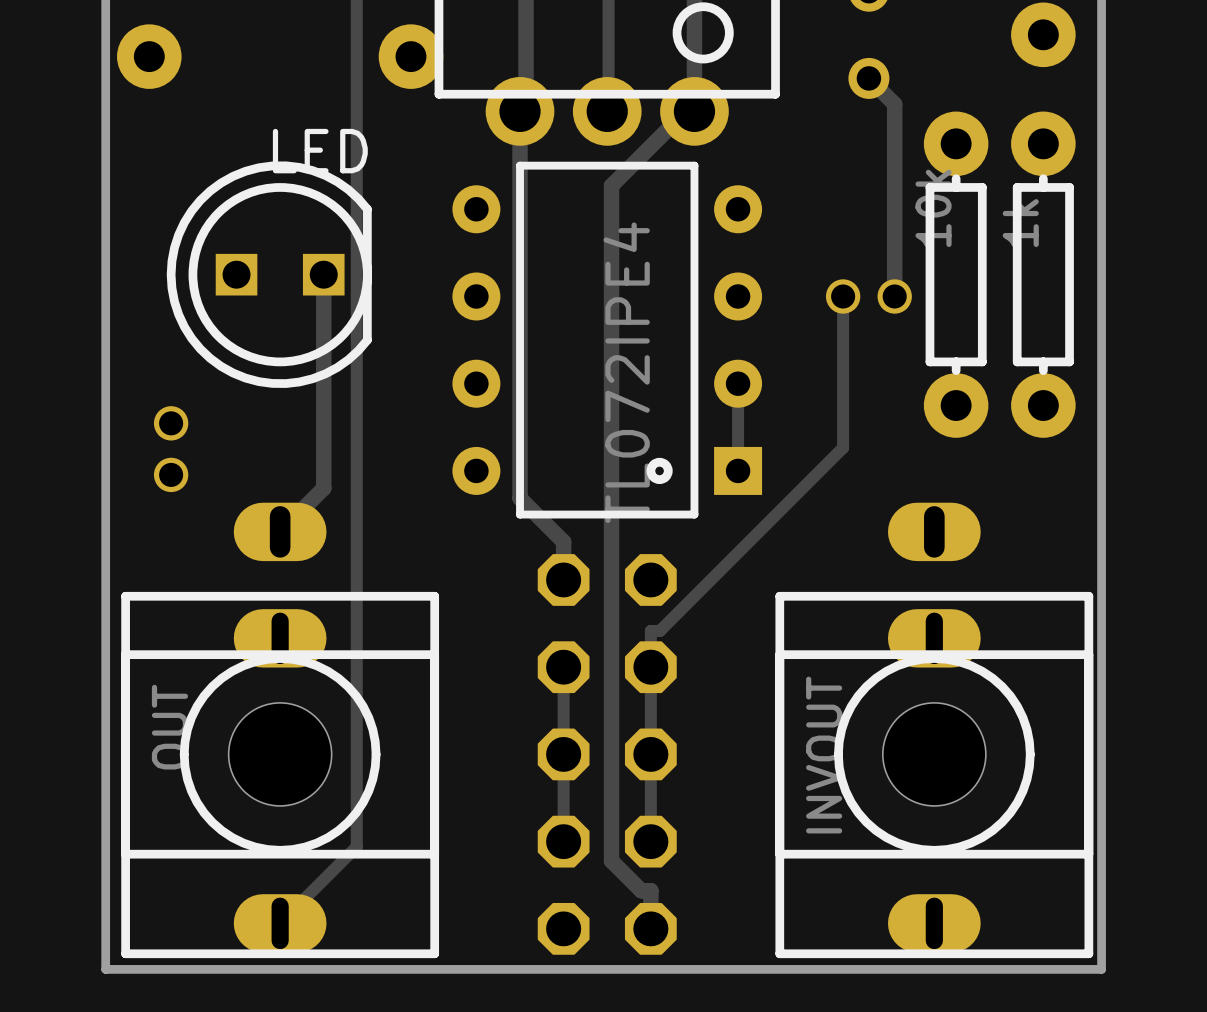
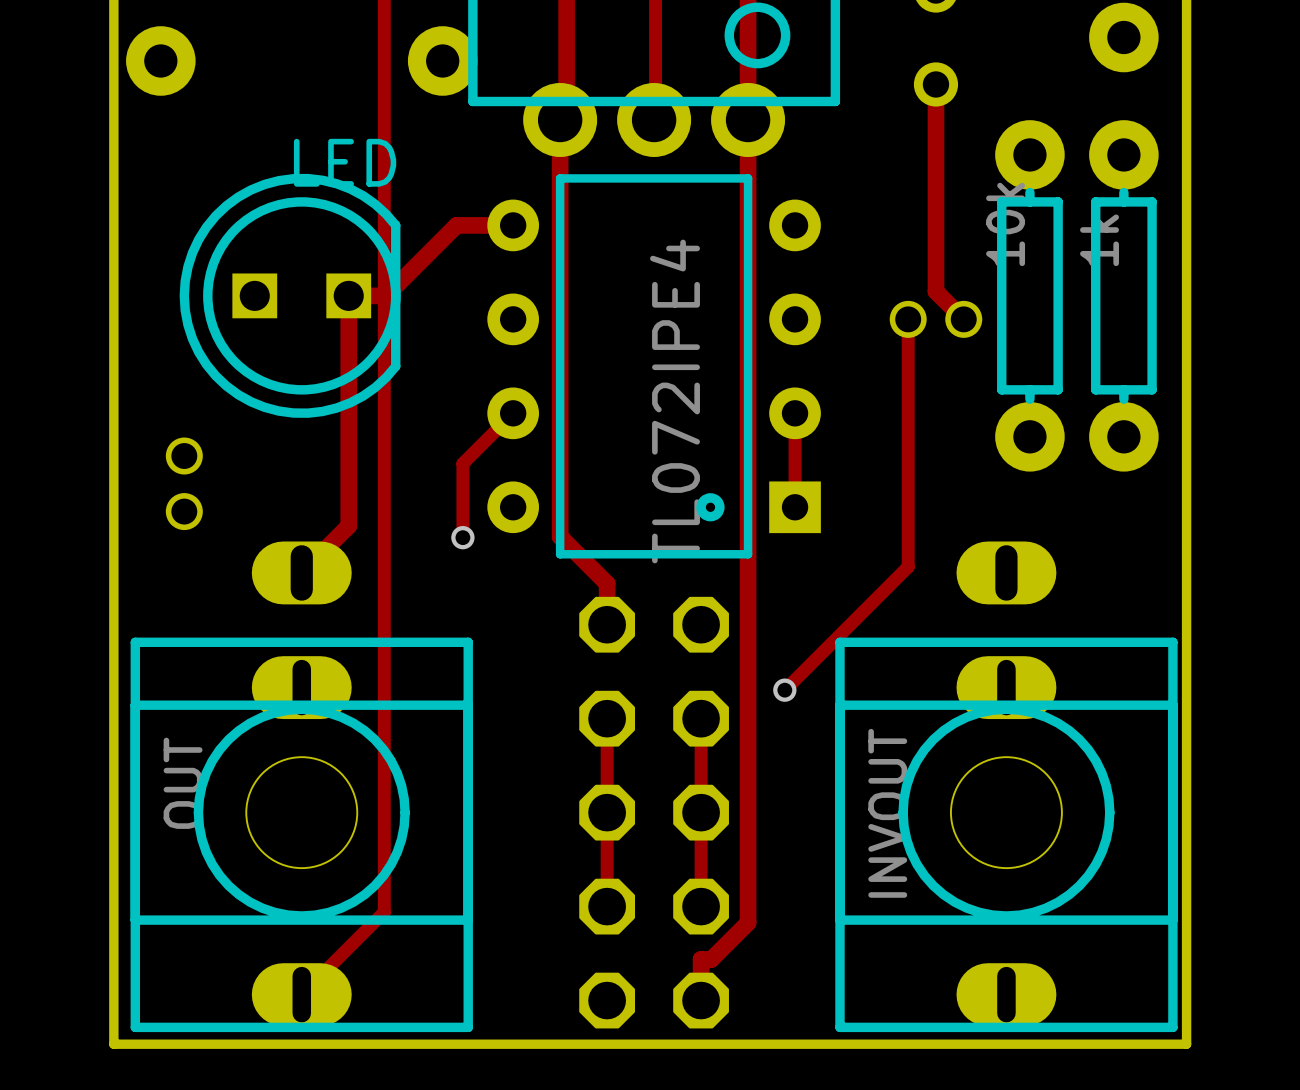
track: (868, 78) (894, 104) (894, 296) -> (935, 84) (935, 291) (963, 319)
track: (694, 111) (685, 111) (611, 185) (611, 860) (641, 890) (650, 890) -> (748, 119) (748, 922) (711, 959) (701, 959)
track: none -> (513, 225) (456, 225) (386, 295) (348, 295)
track: none -> (513, 413) (462, 463) (462, 537)
track: (843, 447) (659, 630) (650, 630) (650, 667) -> (908, 482) (908, 566) (784, 690)
via: none -> (462, 537)
via: none -> (784, 690)

